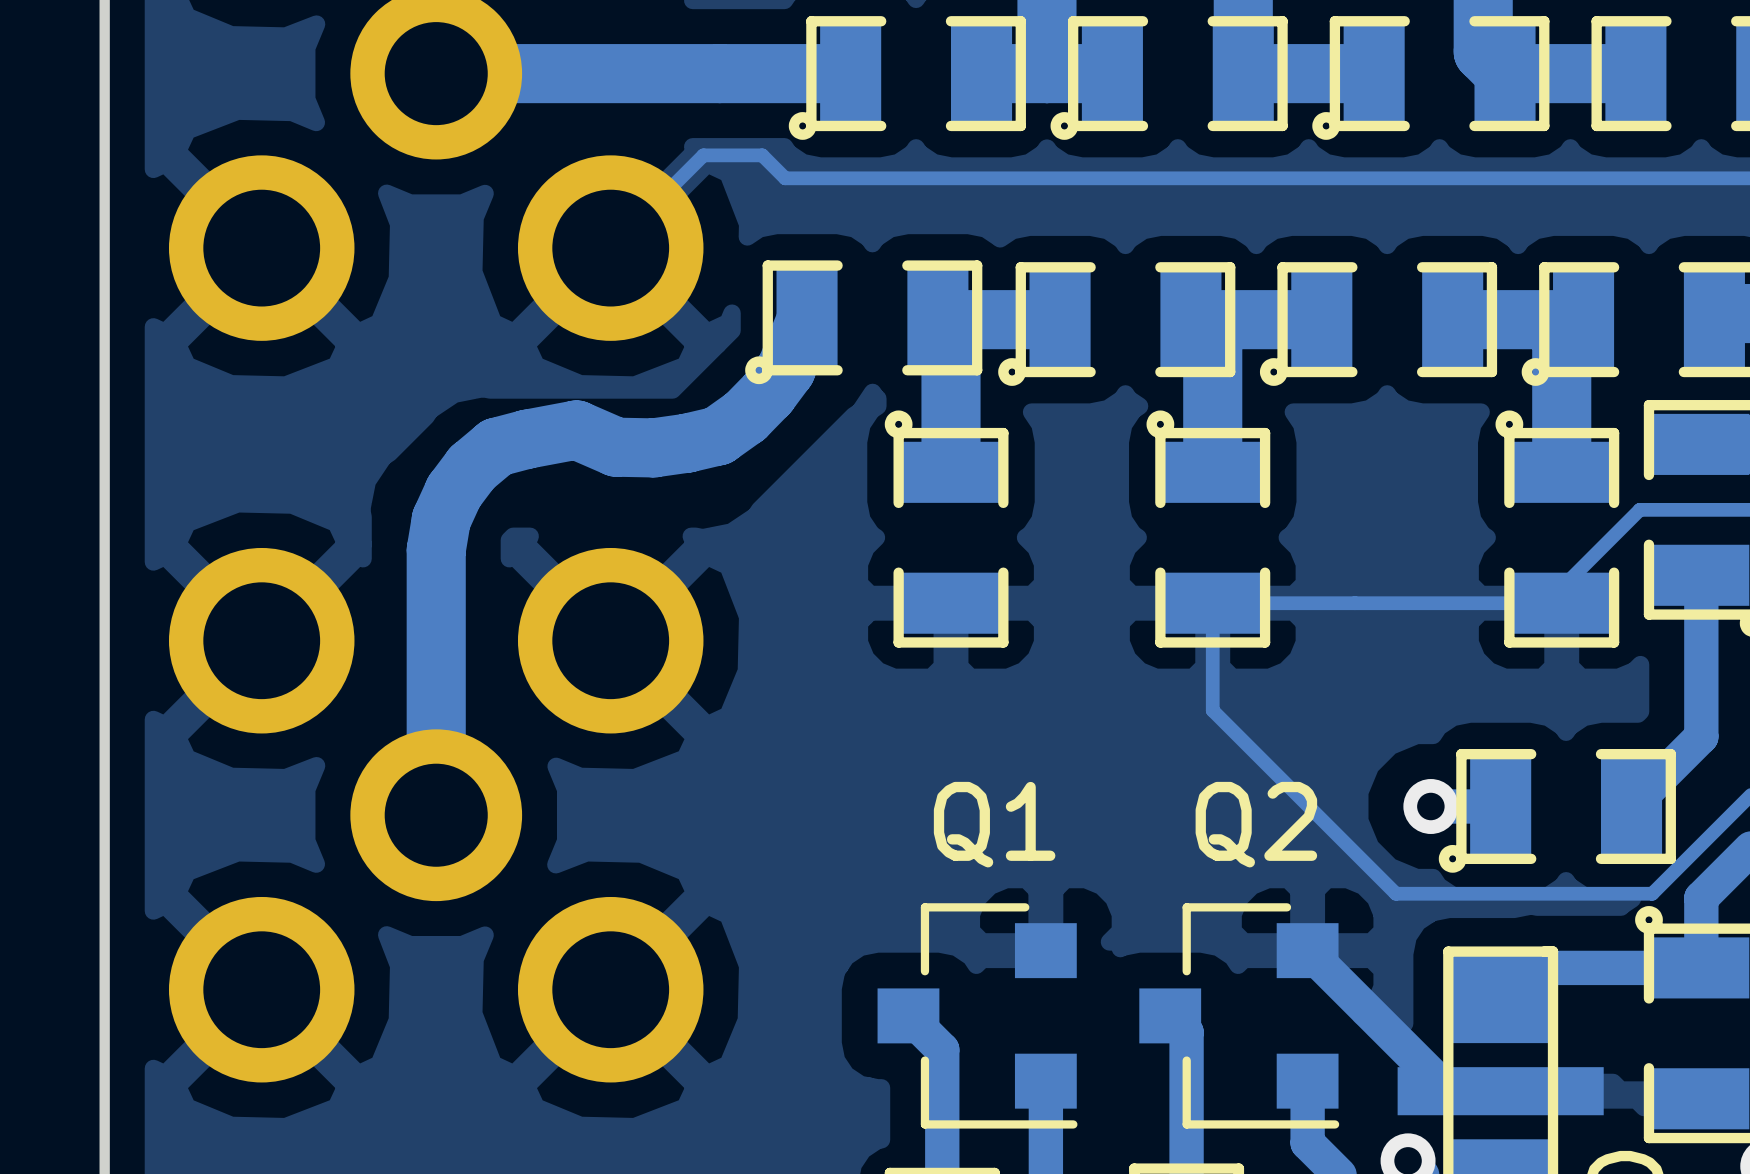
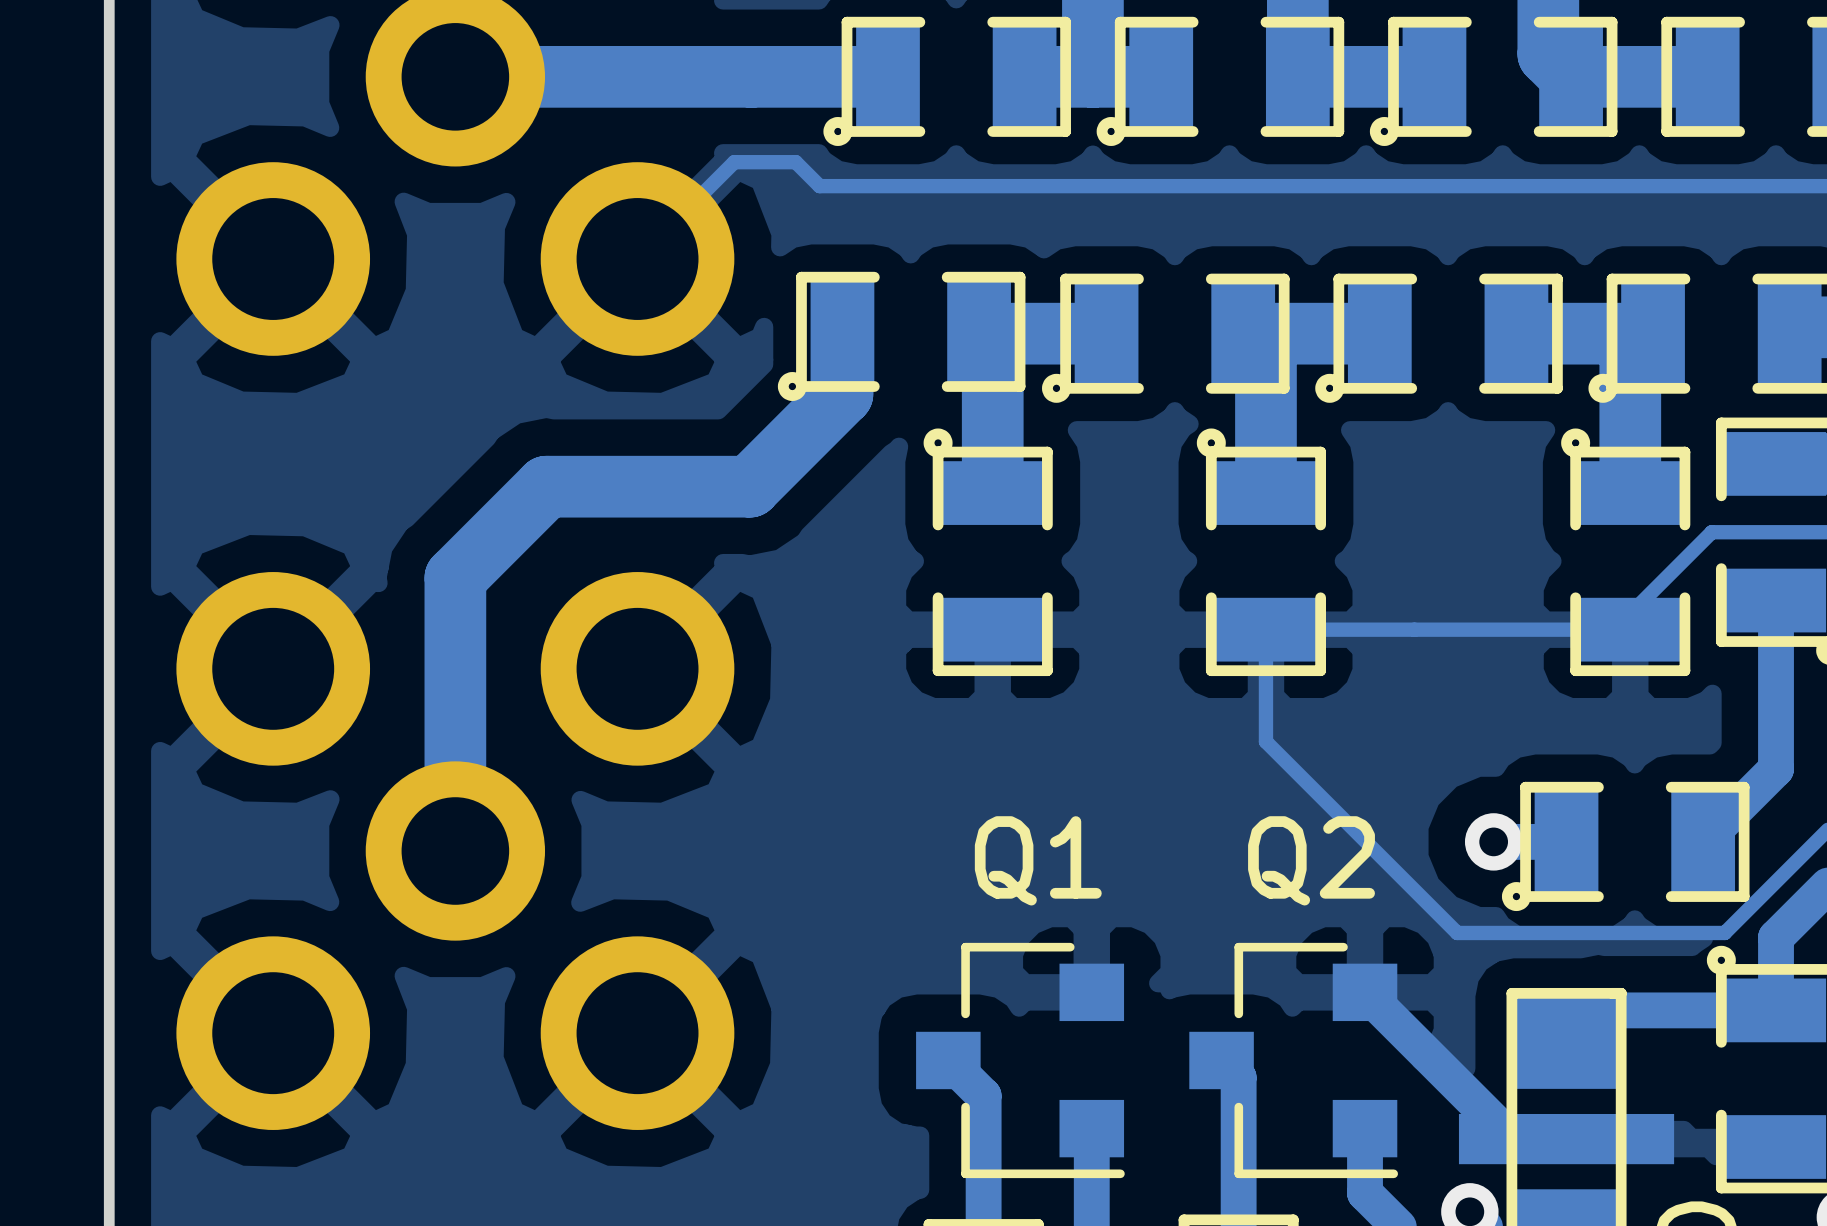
track: (807, 317) (786, 369) (768, 393) (745, 416) (718, 435) (653, 447) (616, 447) (576, 429) (496, 447) (472, 467) (454, 491) (441, 519) (436, 553) -> (842, 331) (842, 394) (749, 486) (546, 486) (455, 577)

